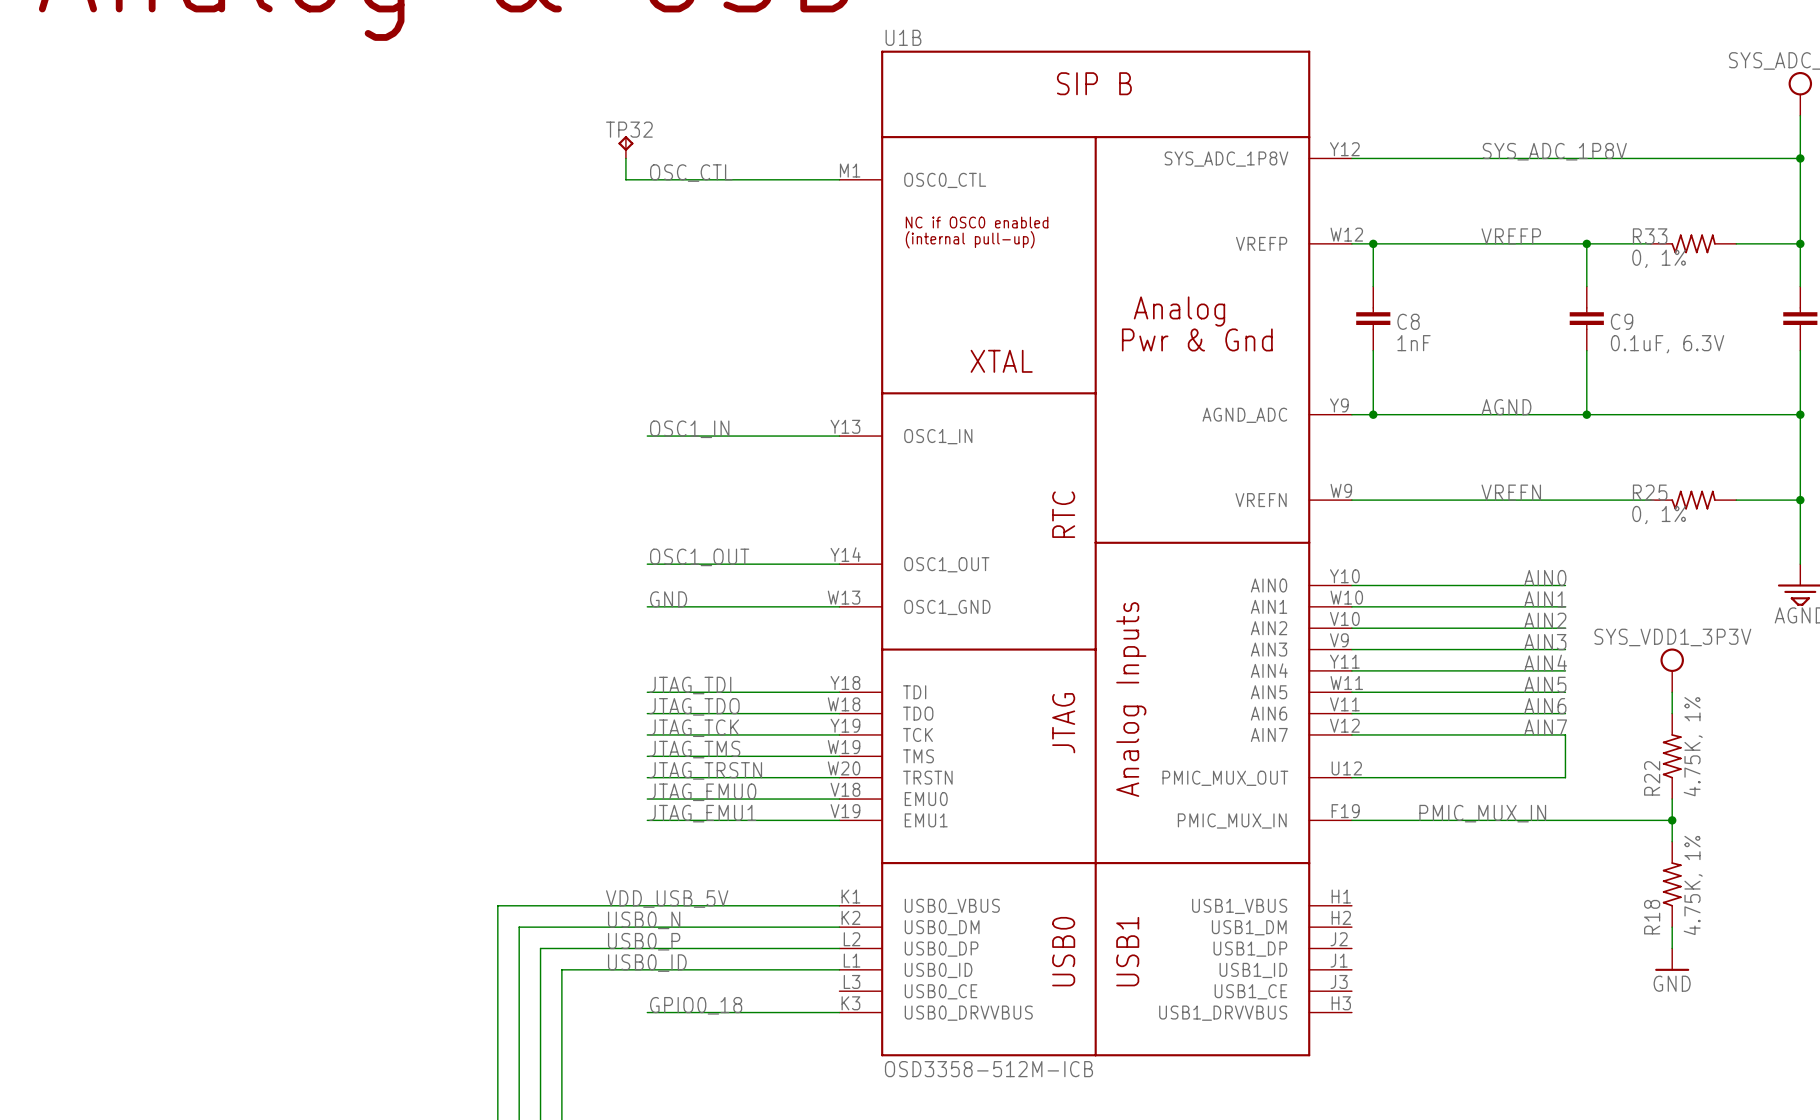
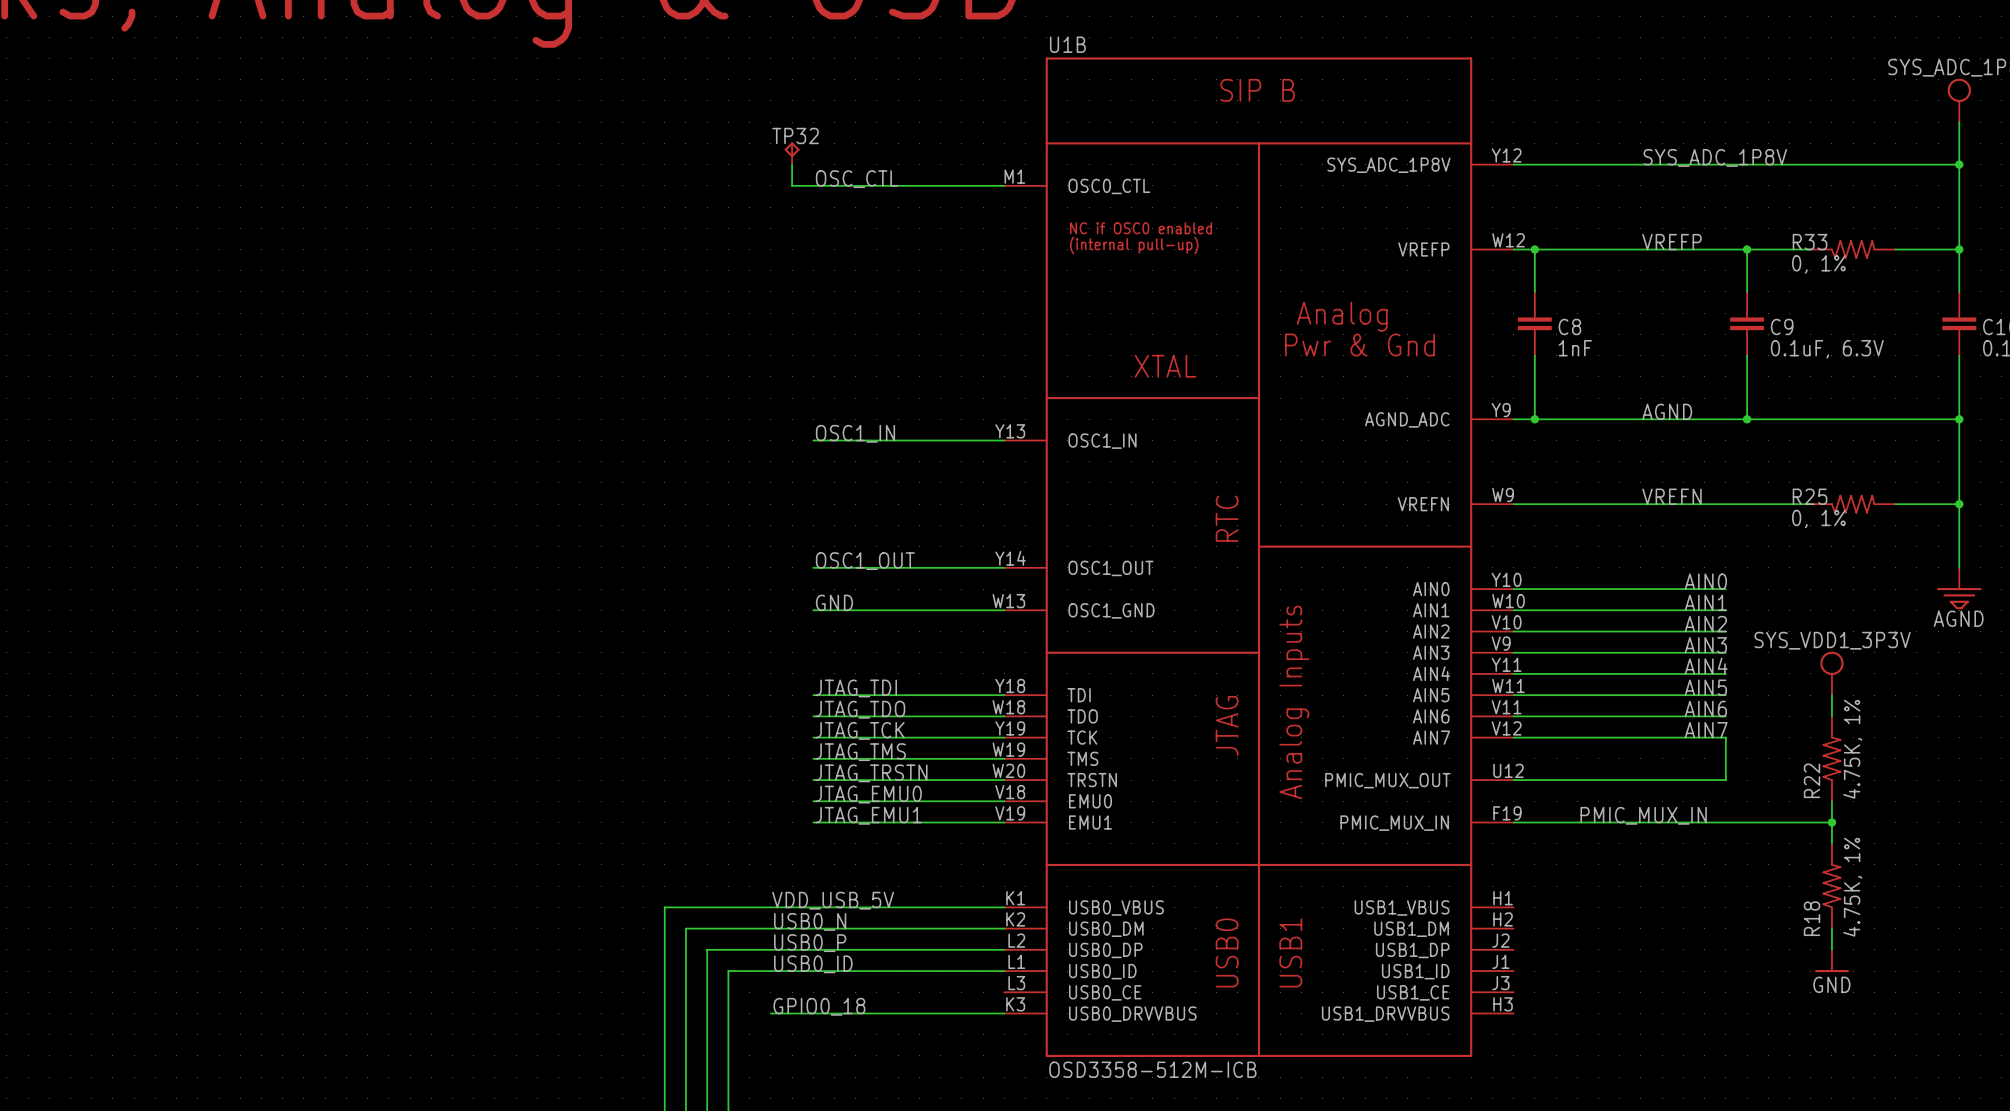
label position: GPIO0_18 (696, 1005) -> GPIO0_18 (819, 1006)
wire: none -> (770, 1013) (813, 1013)

